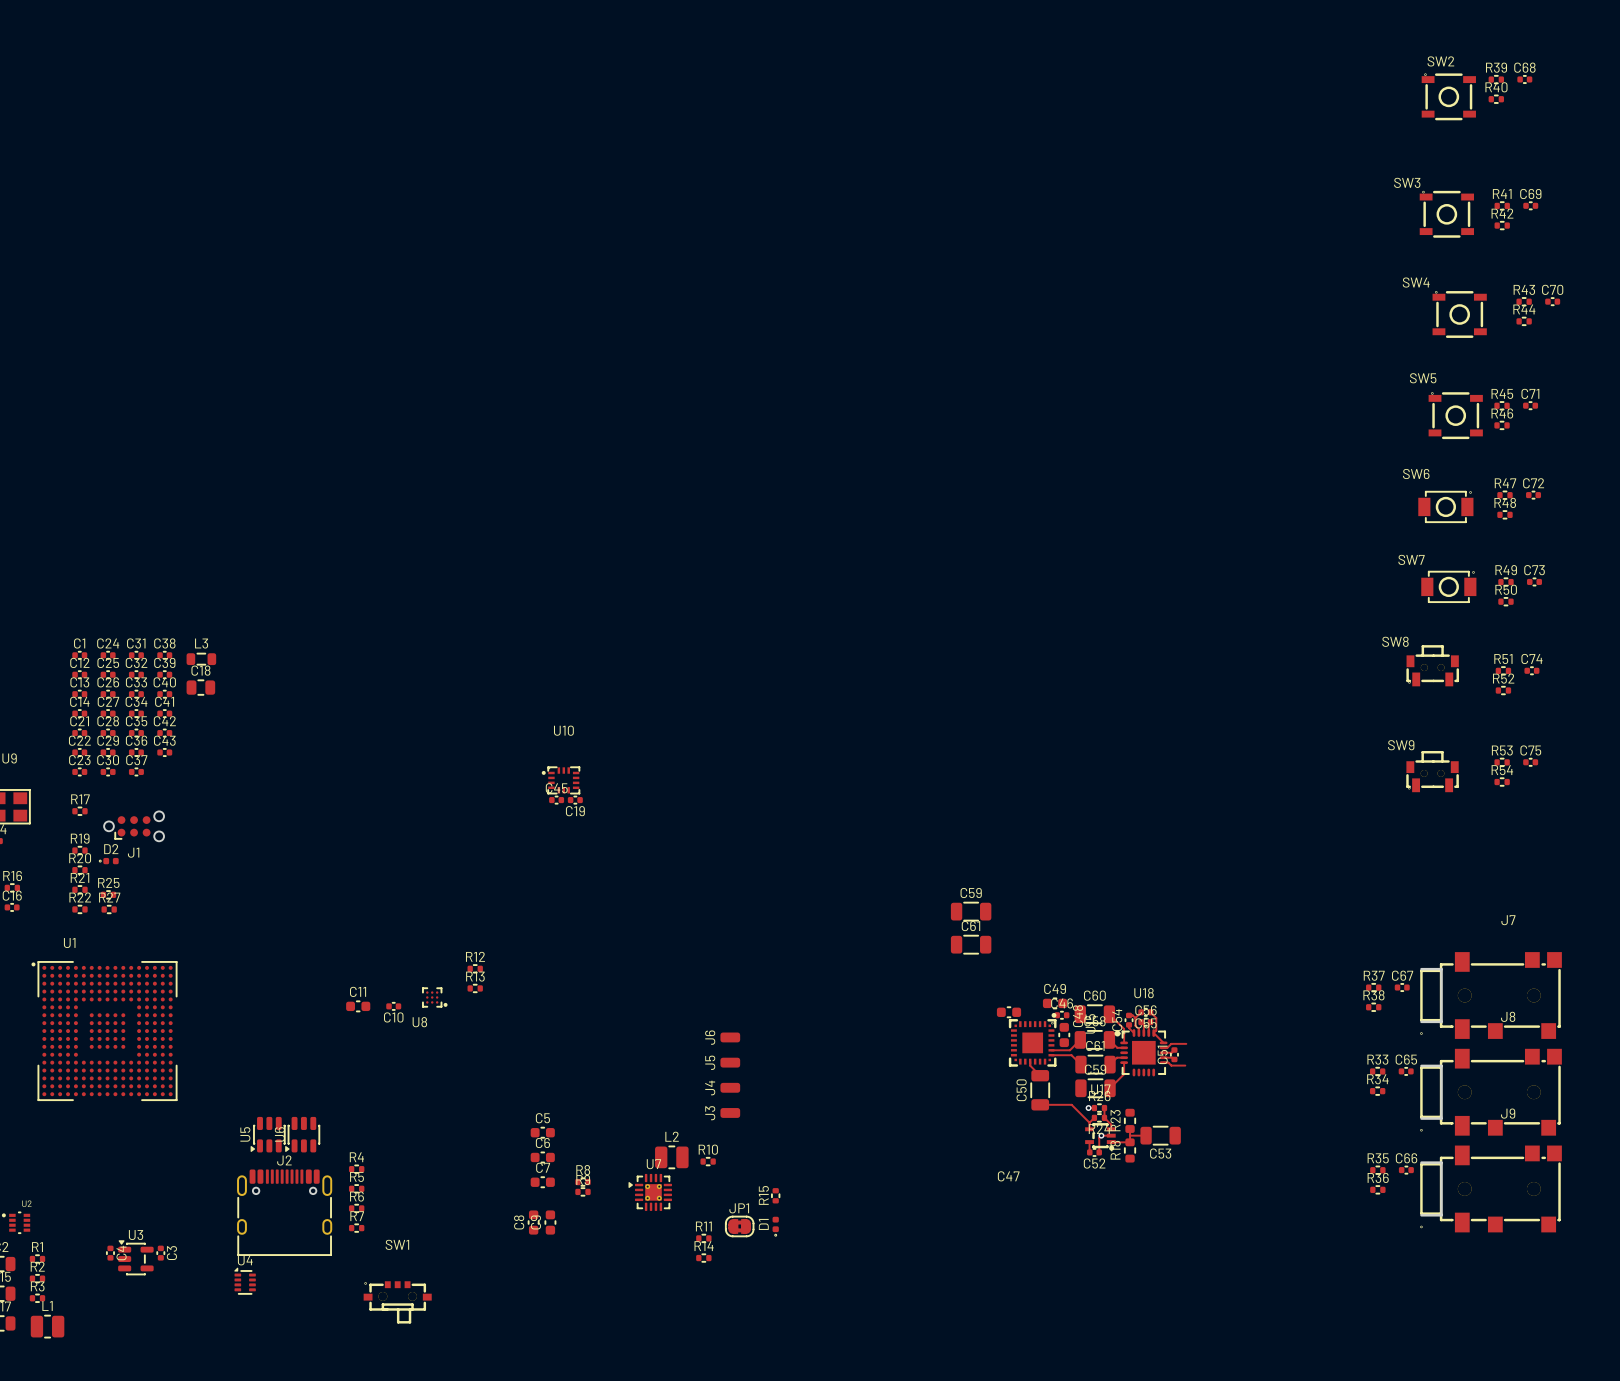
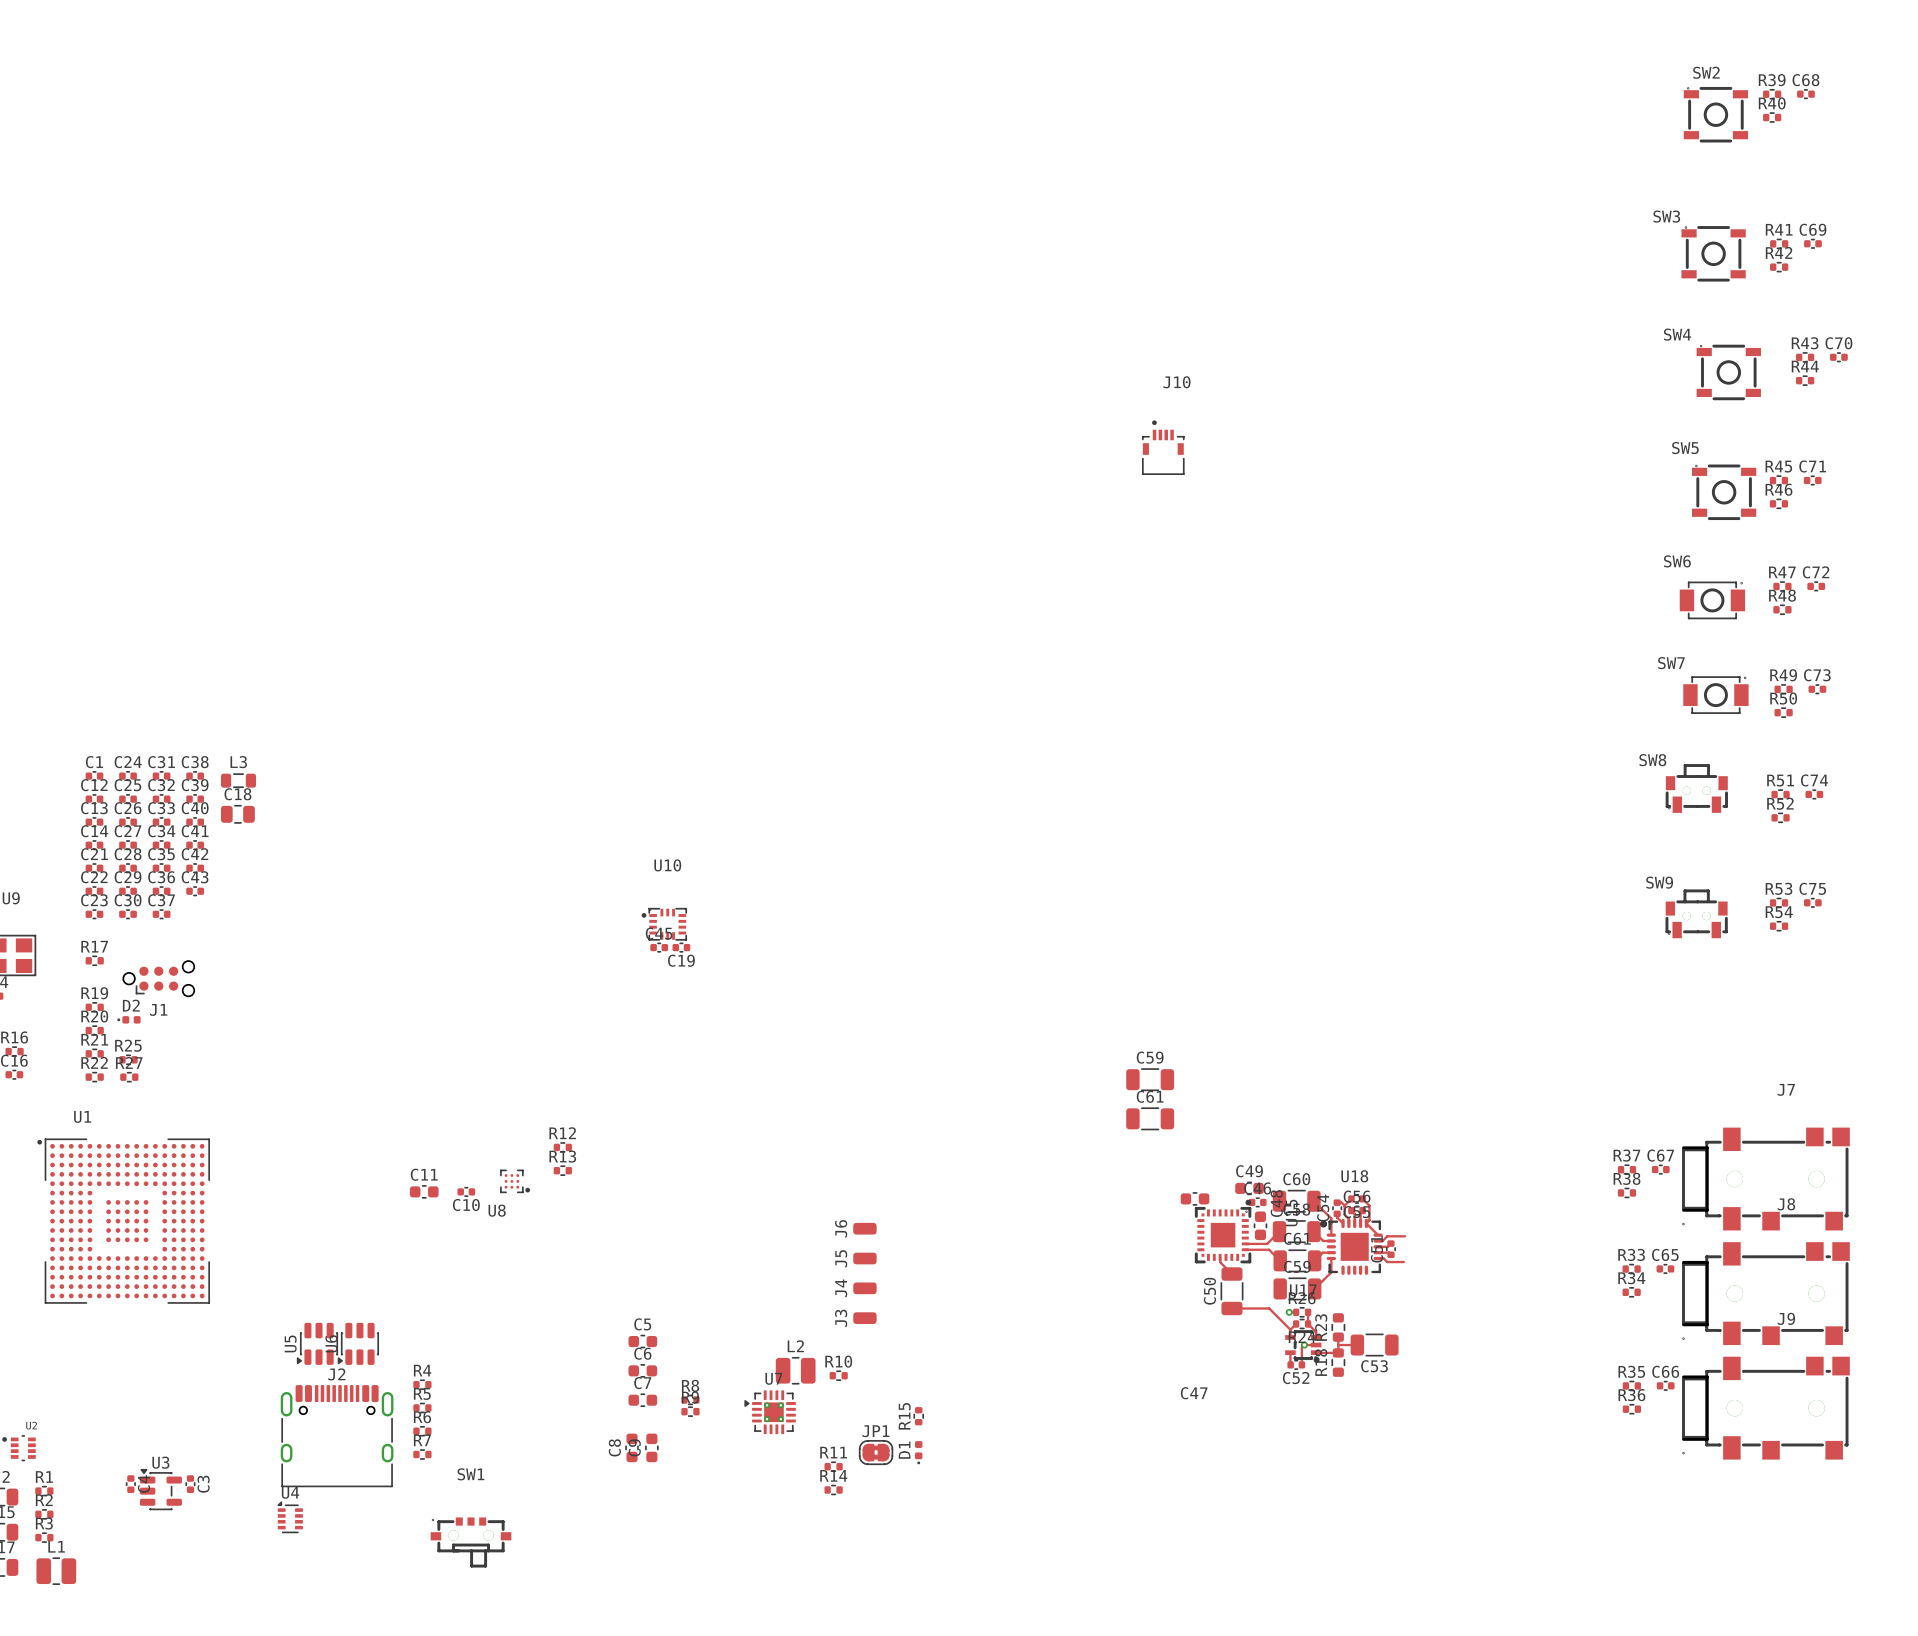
J10: none -> (1163, 447)

